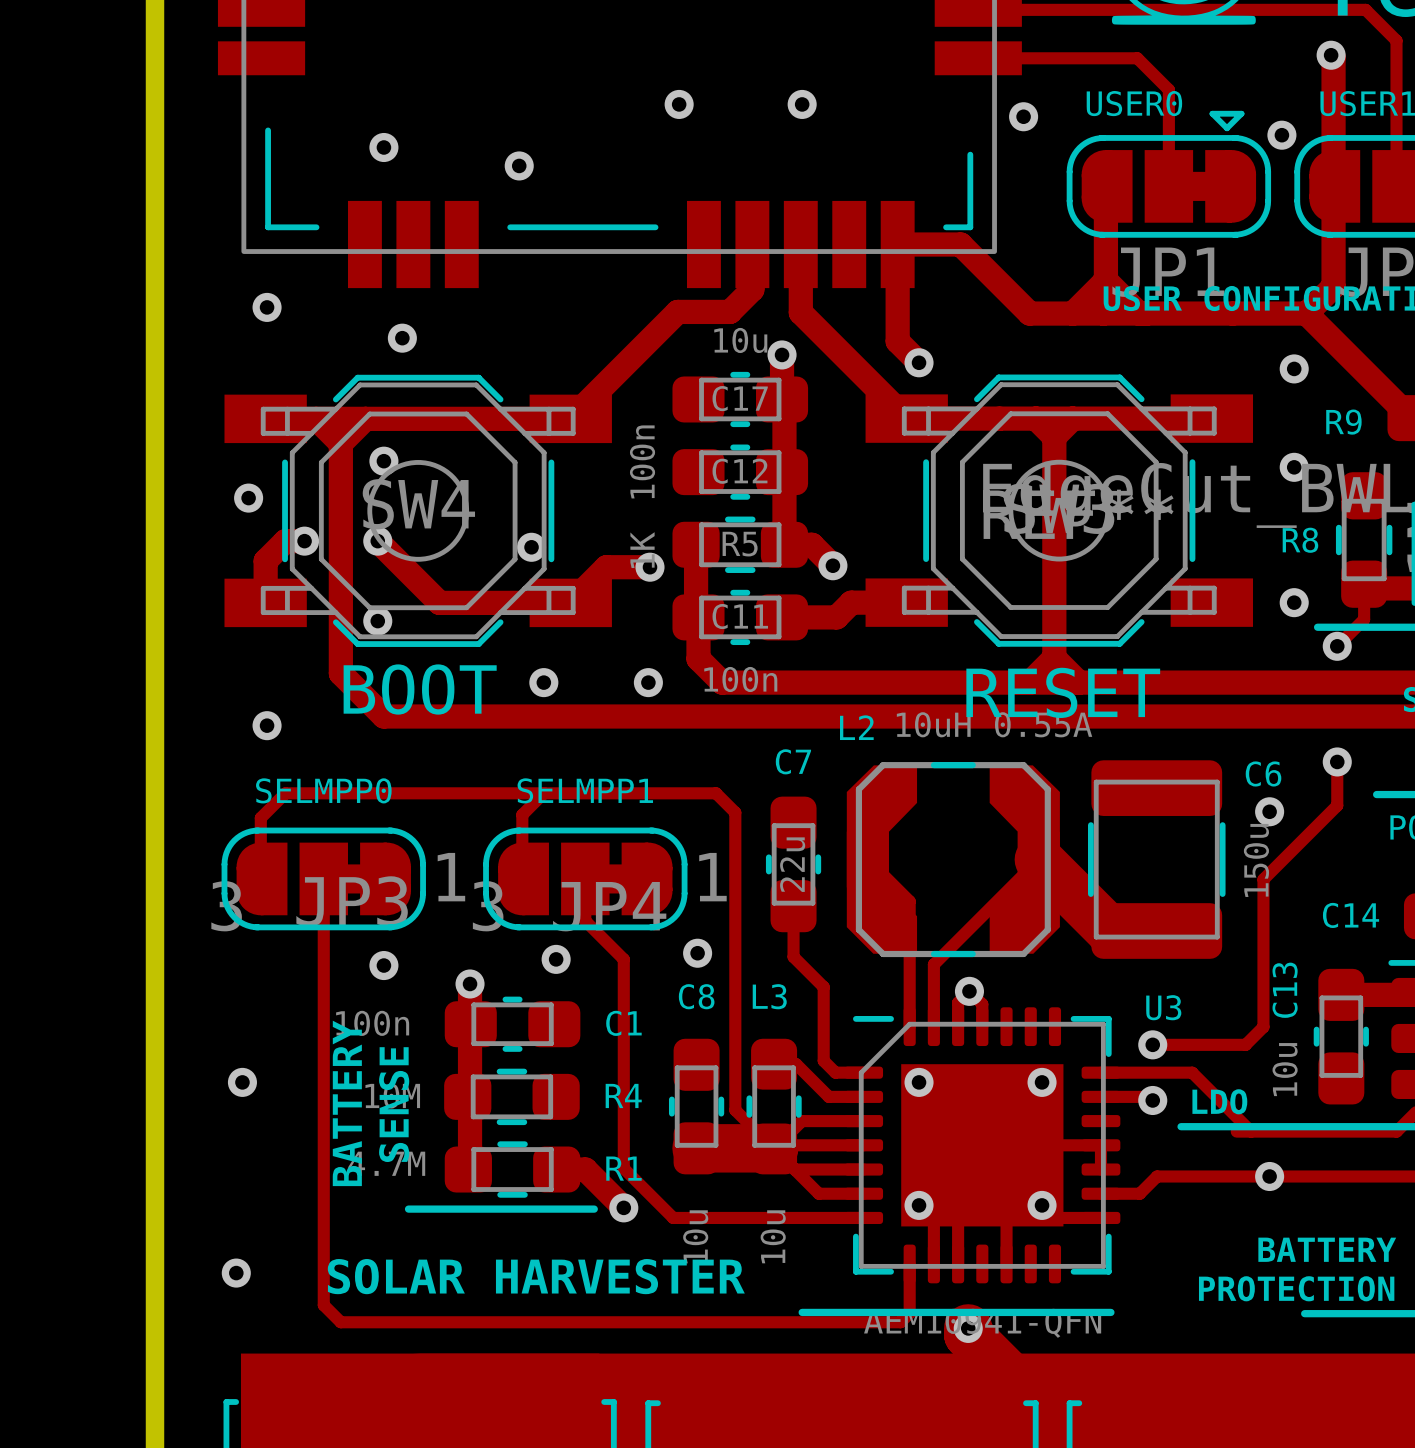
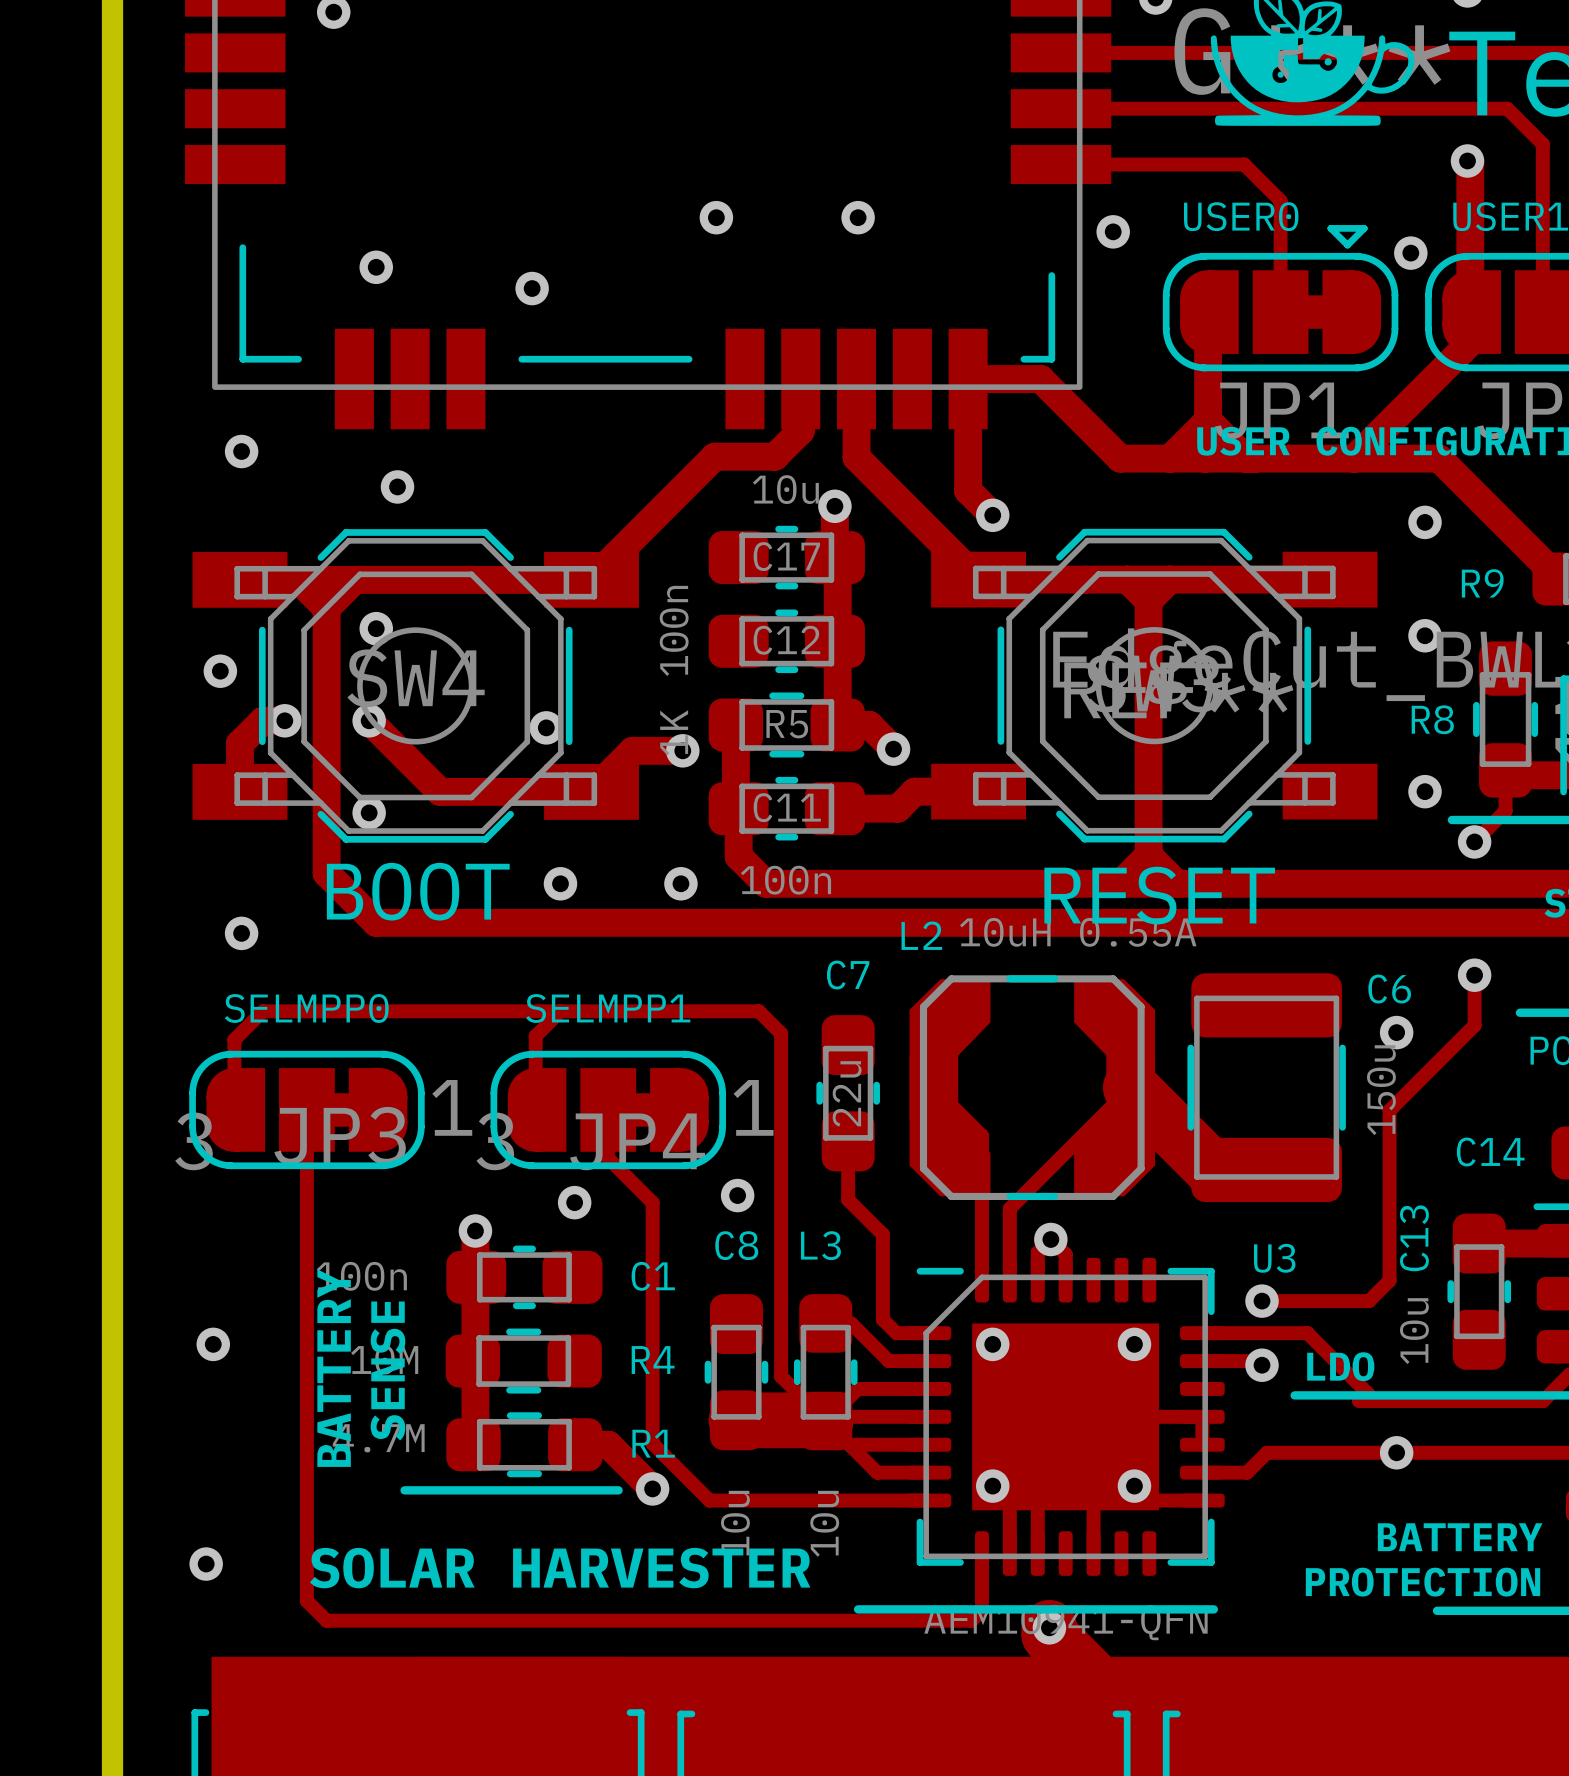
track: (1333, 212) (1333, 286) (1306, 313) -> (1470, 342) (1354, 458)
via: (383, 965) -> none

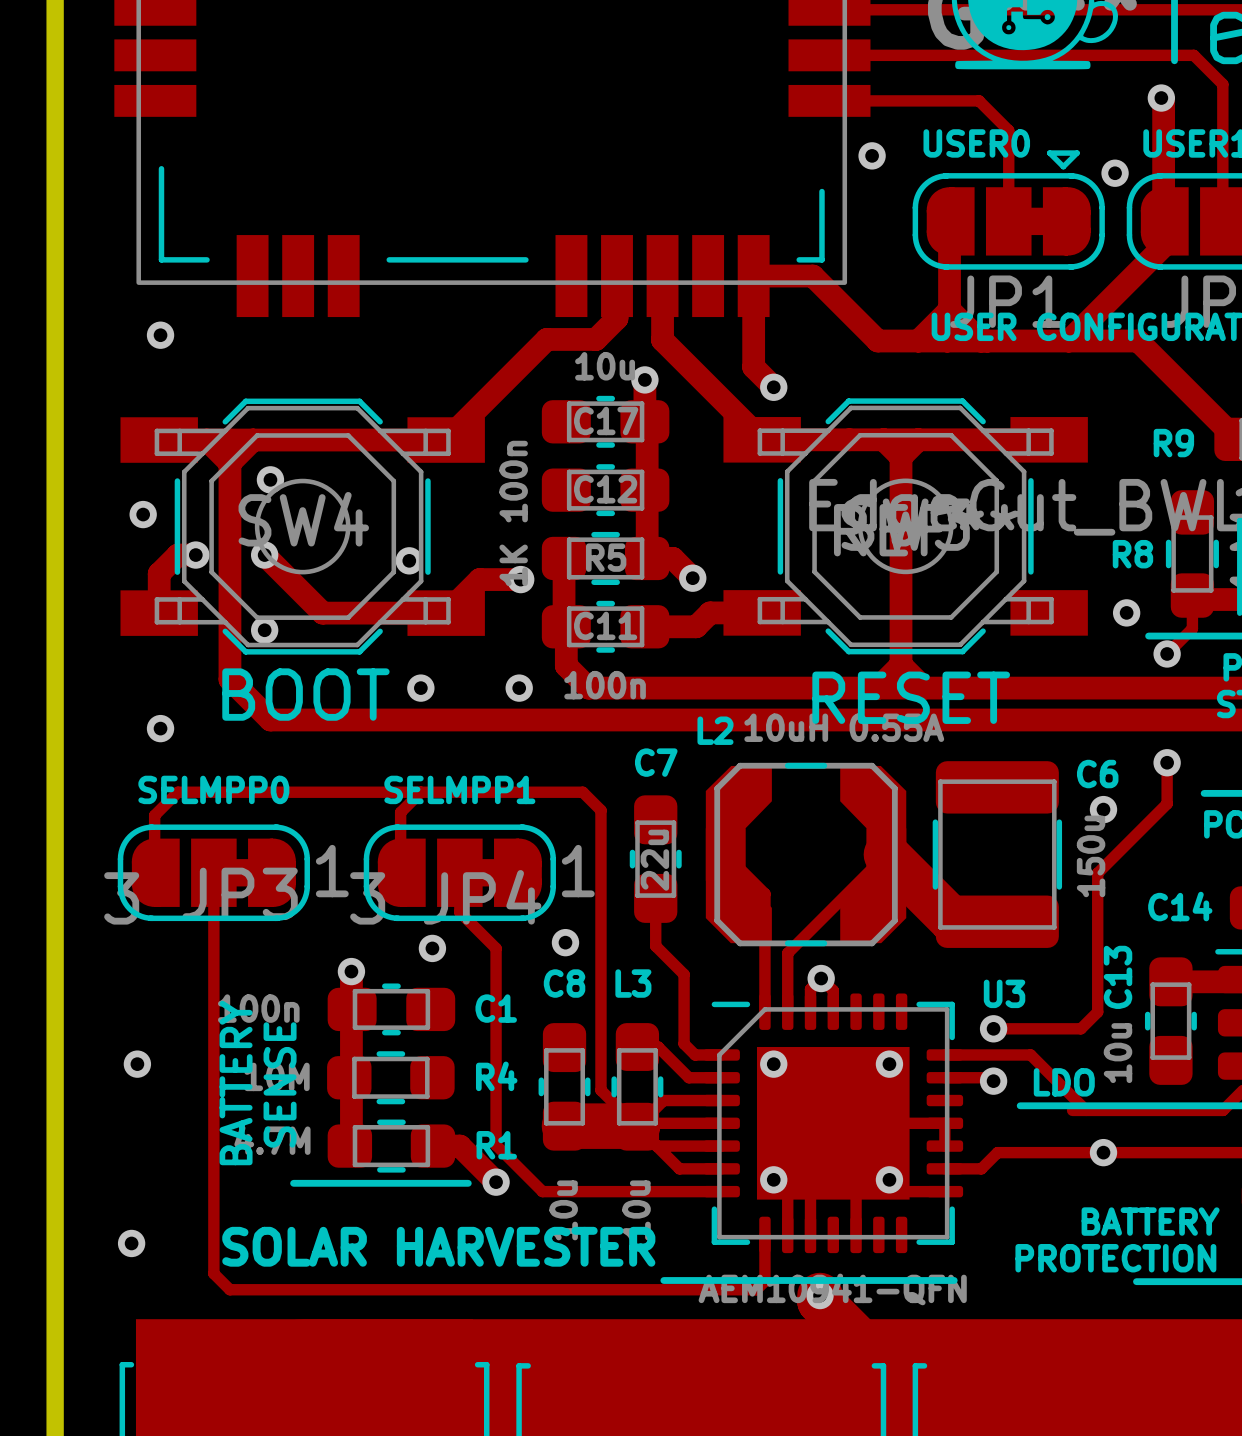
via: (716, 217) -> none
via: (858, 217) -> none
via: (376, 267) -> none
via: (532, 288) -> none
via: (397, 486) -> none
via: (1424, 522) -> none
via: (1424, 635) -> none

